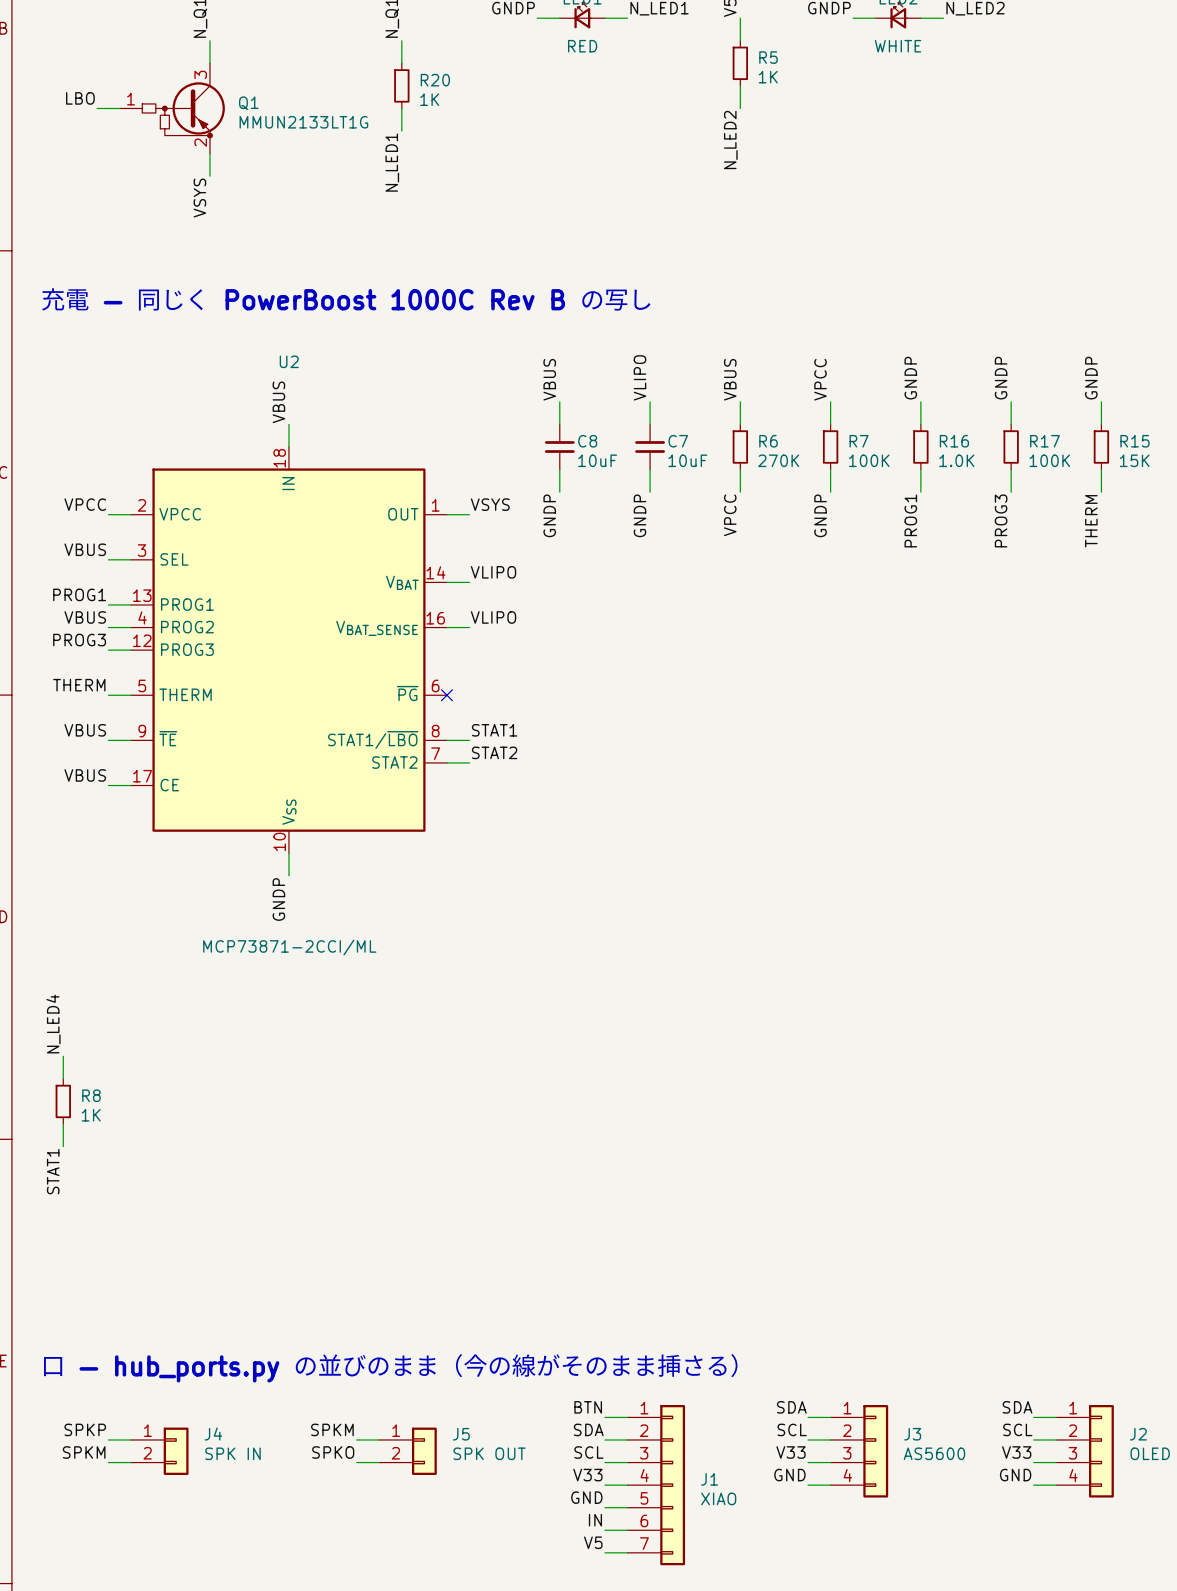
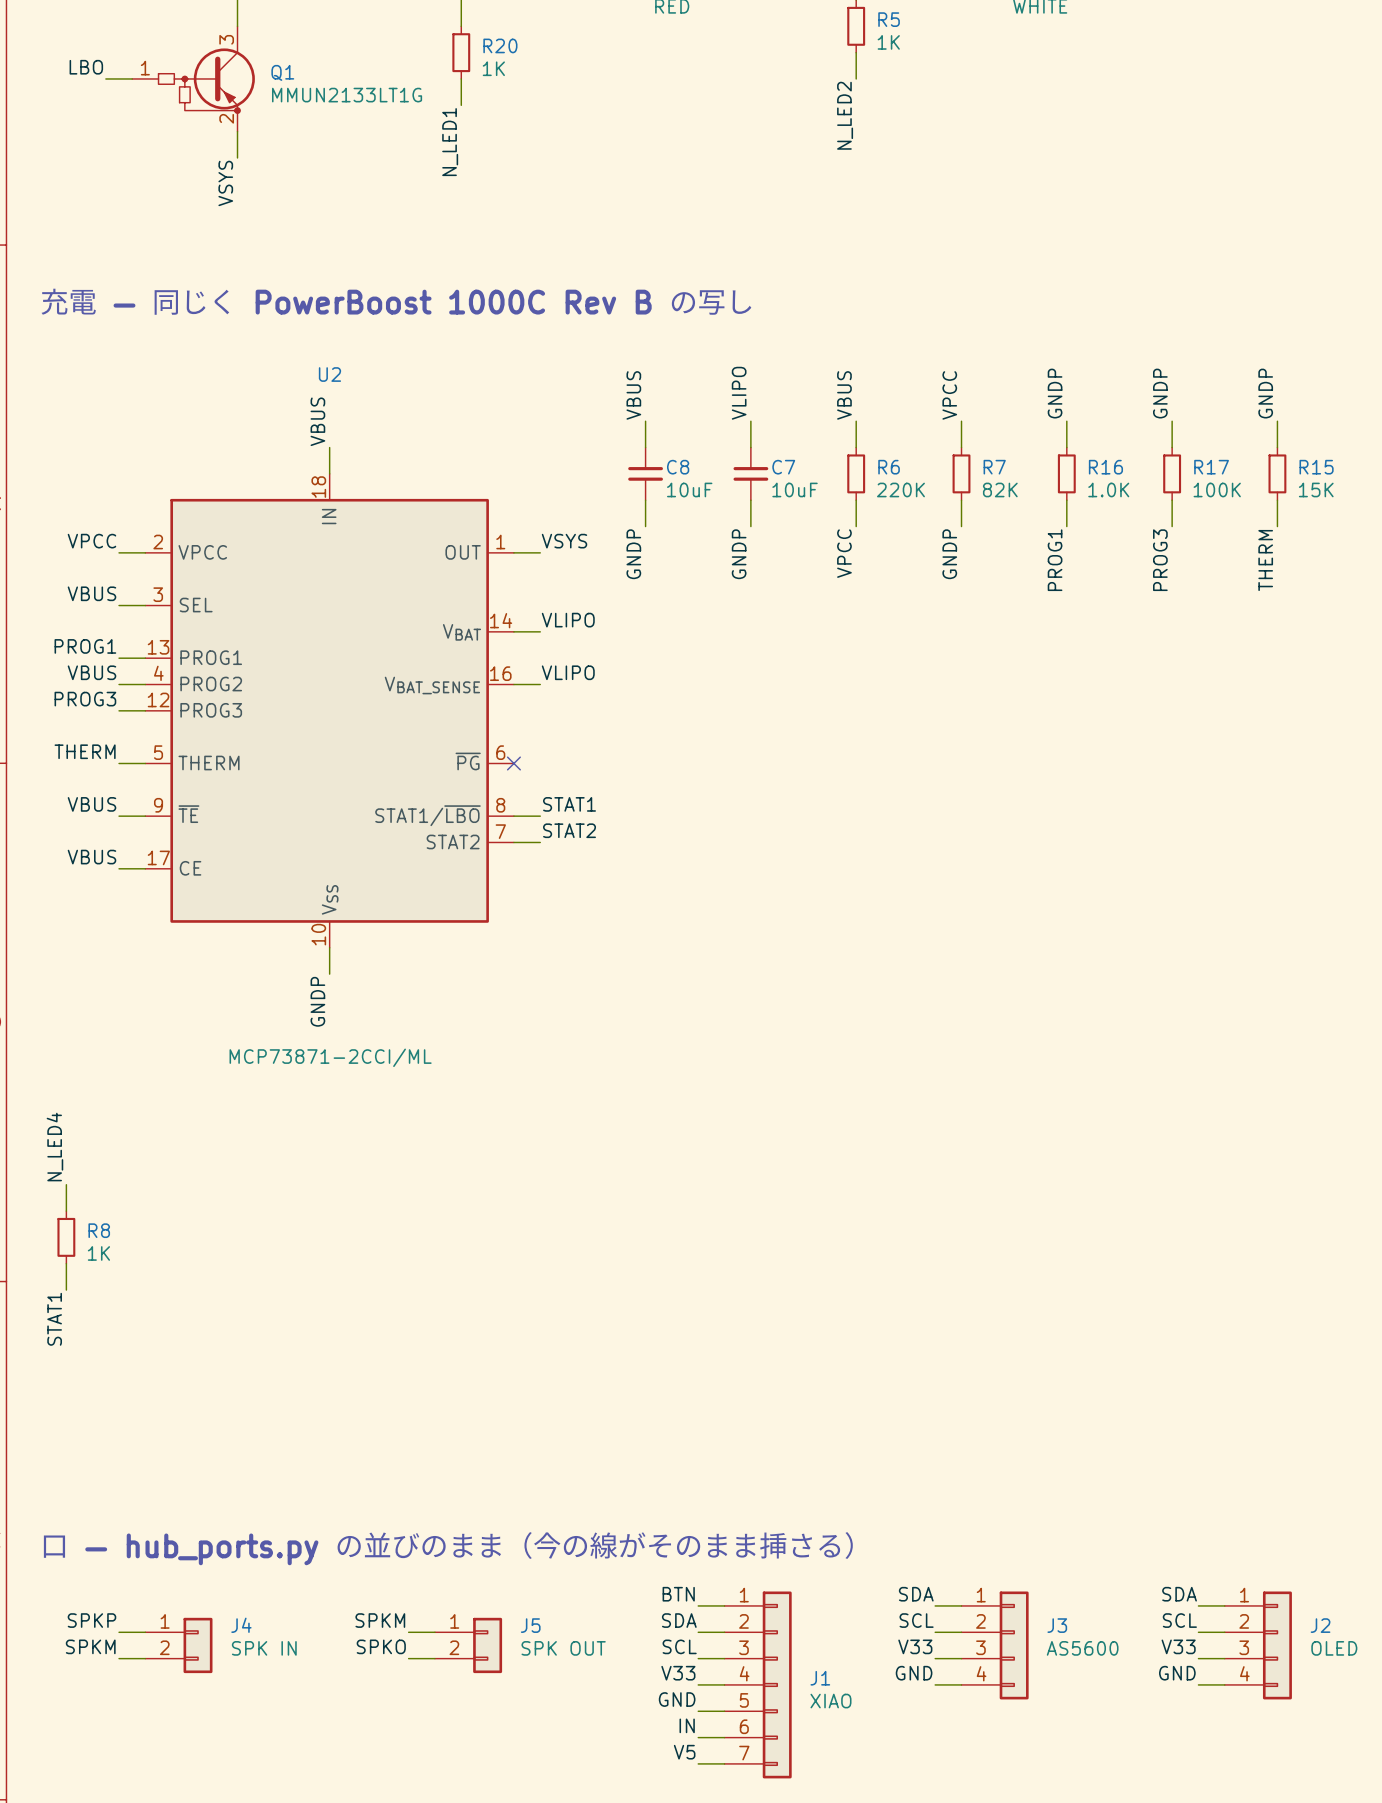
R6 value: 270K (778, 460) -> 220K (900, 489)
R7 value: 100K (869, 460) -> 82K (1000, 489)

